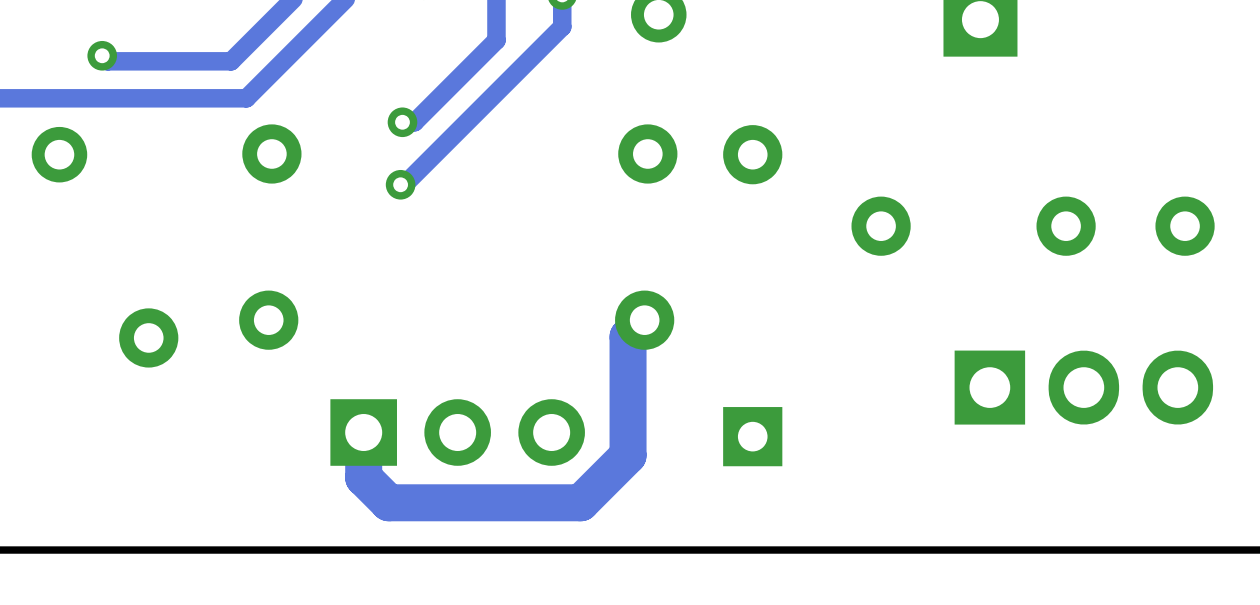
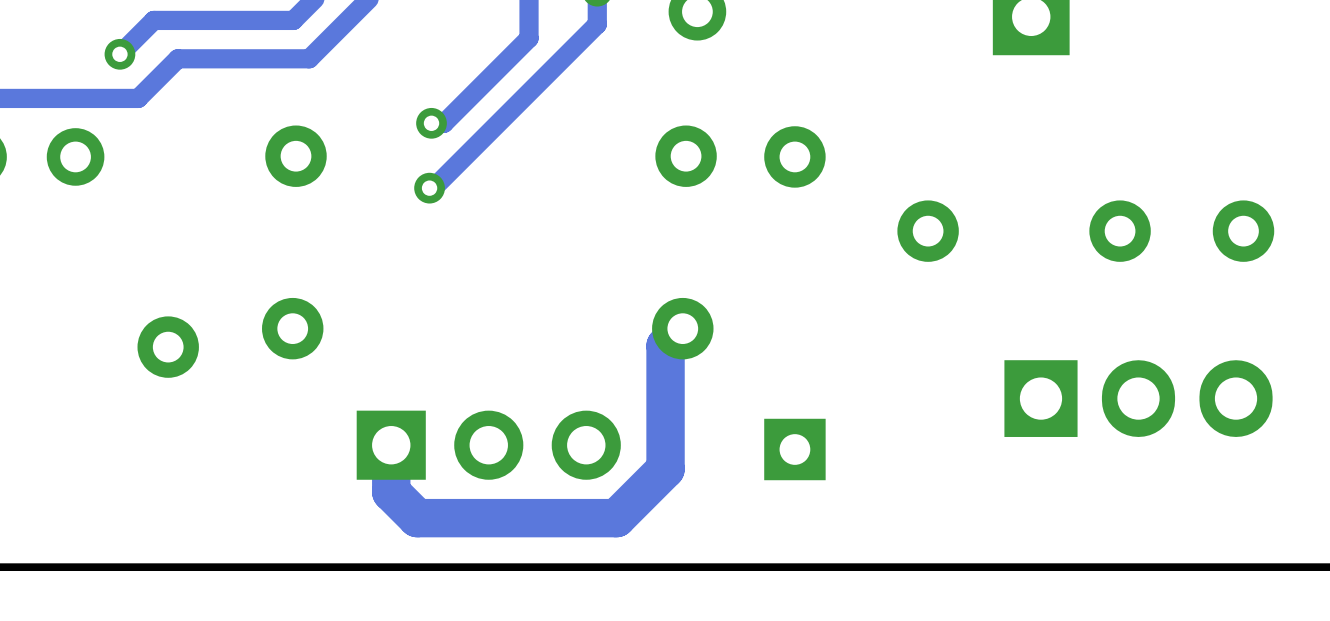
track: (269, 23) (231, 61) (107, 61) (102, 55) -> (293, 20) (153, 20) (119, 54)
track: (284, 60) (246, 98) (119, 98) -> (309, 58) (177, 58) (138, 98)

